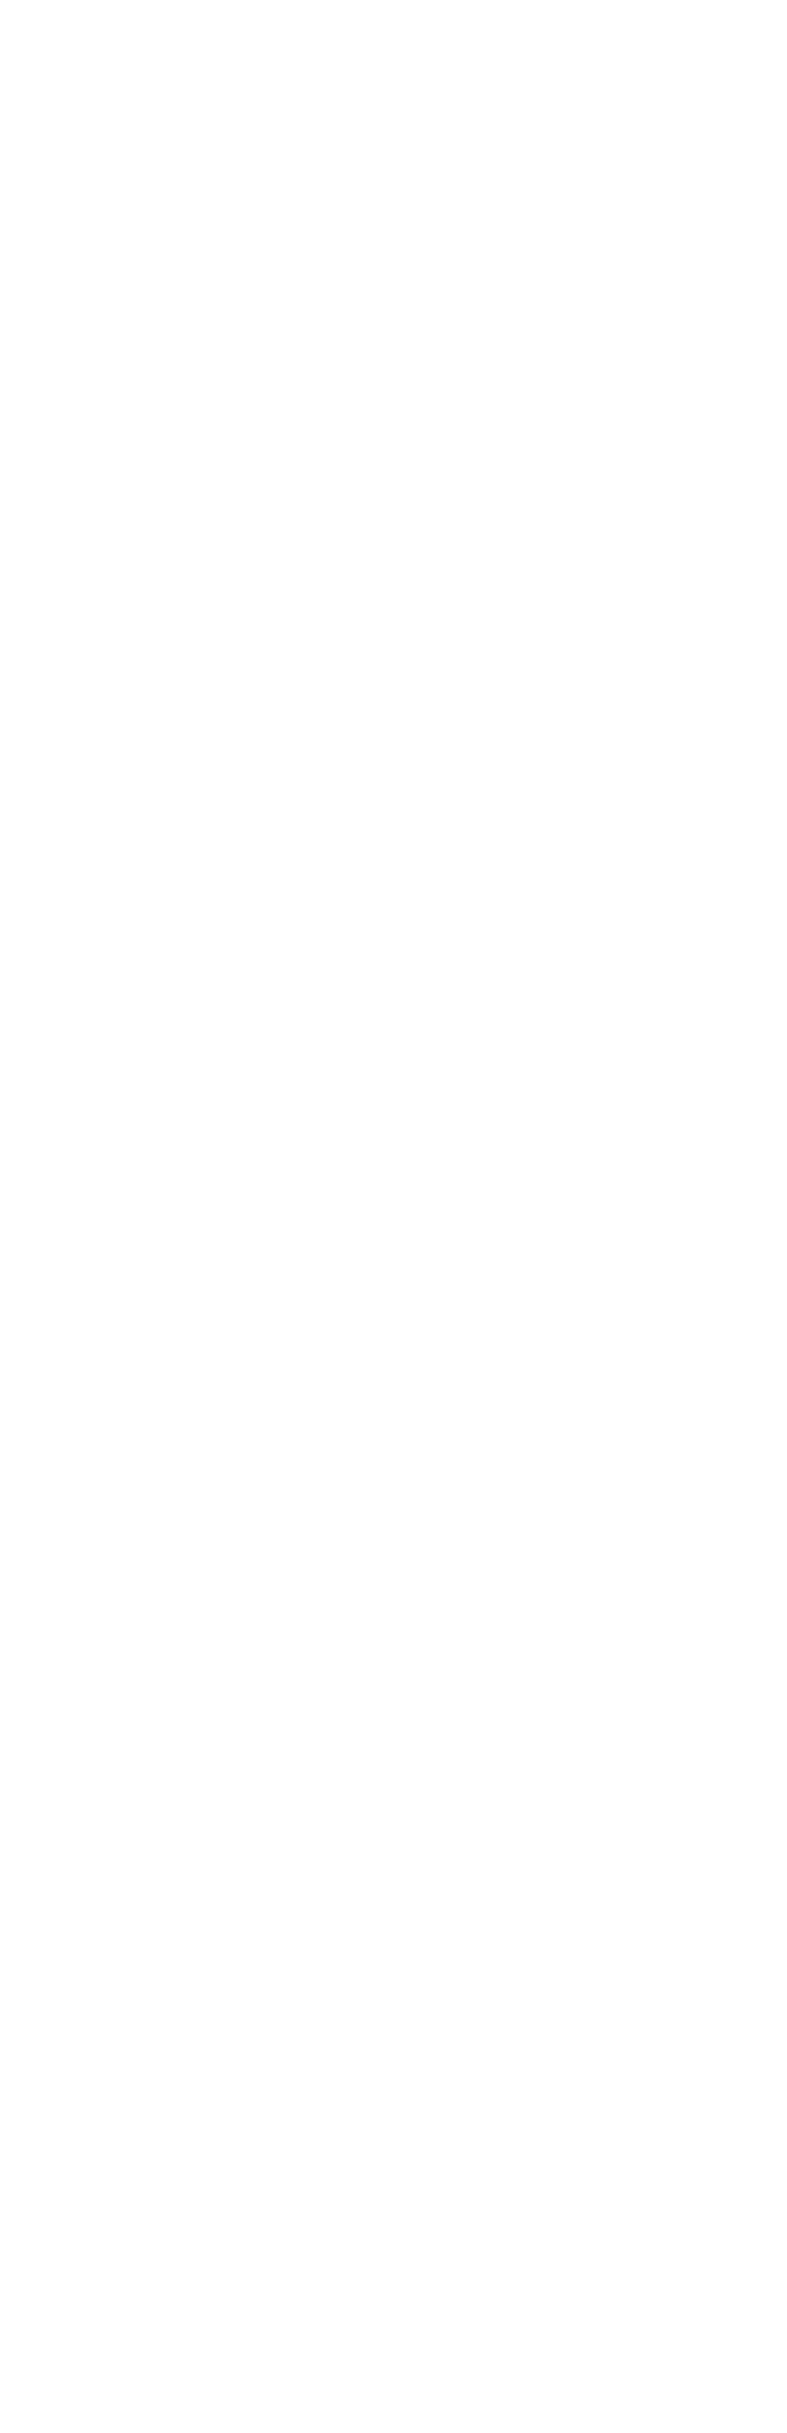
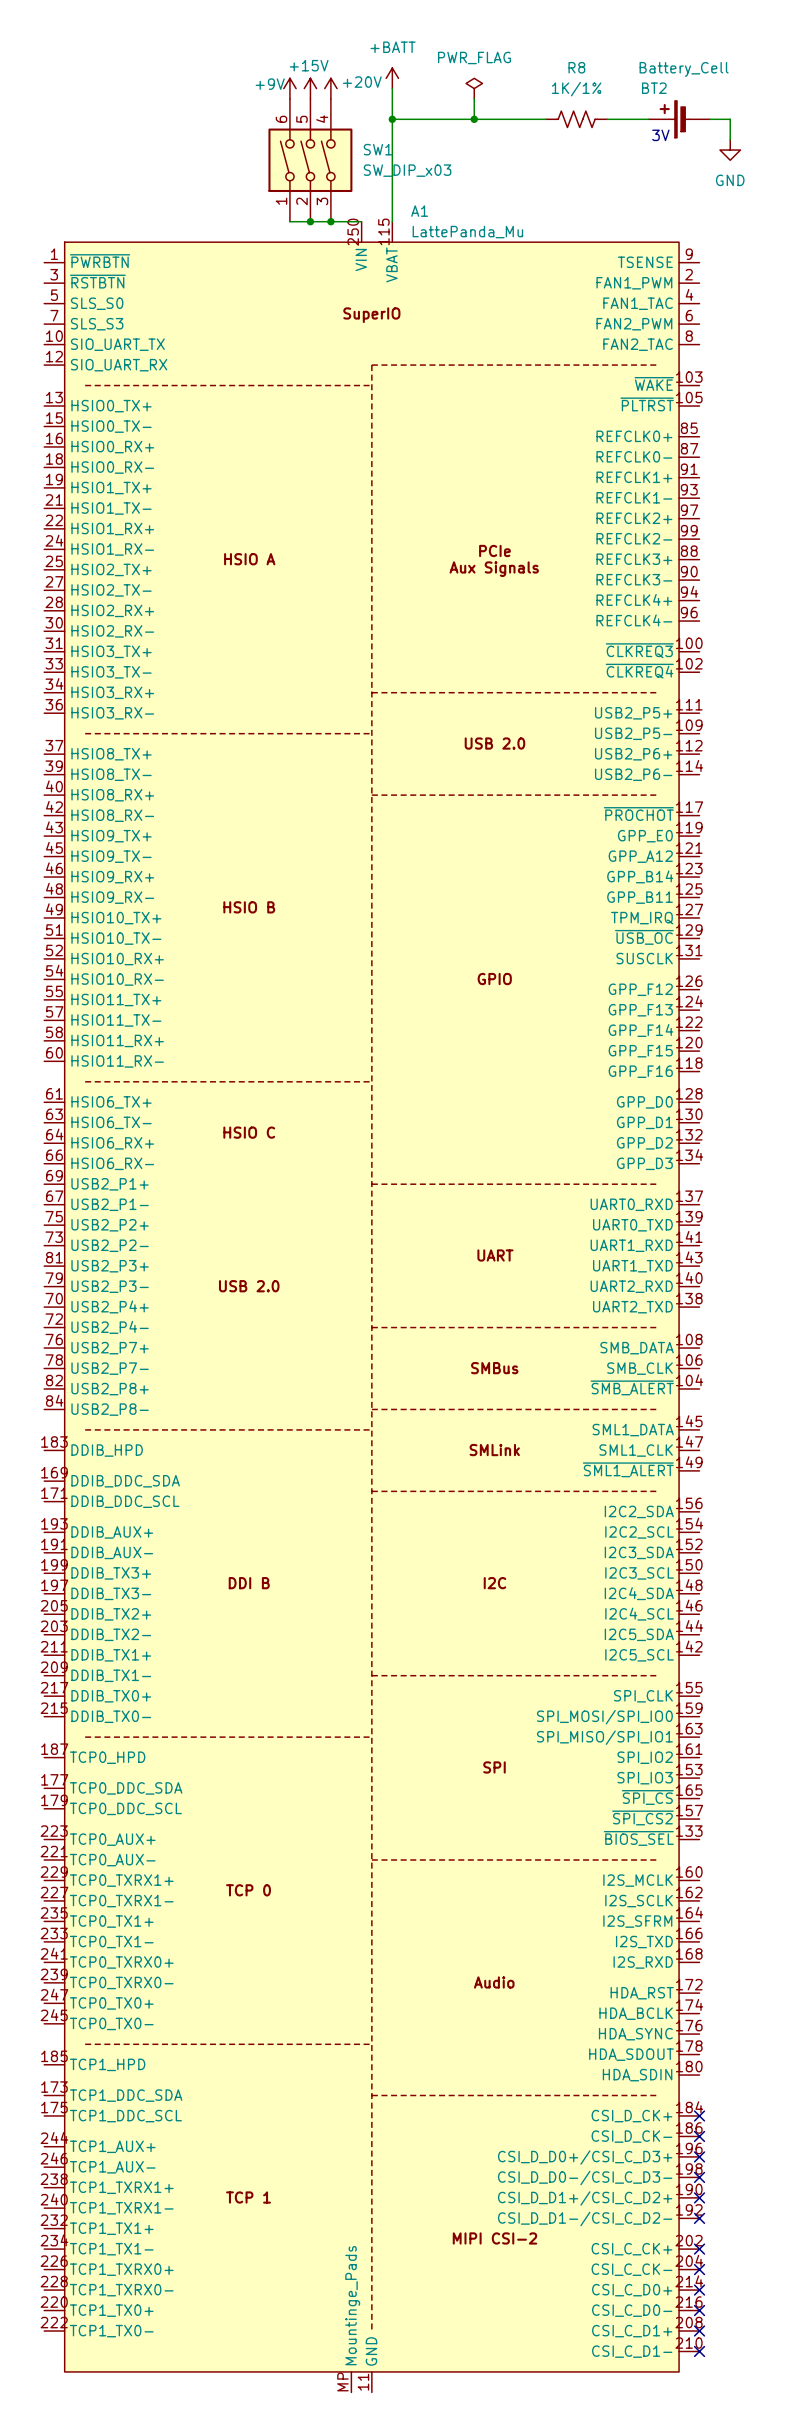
power symbol: none -> +BATT (392, 78)
power symbol: none -> +9V (289, 88)
power symbol: none -> +15V (310, 88)
power symbol: none -> +20V (330, 88)
wire: none -> (392, 88) (392, 221)
power symbol: none -> PWR_FLAG (474, 88)
wire: none -> (474, 98) (474, 119)
wire: none -> (392, 119) (545, 119)
junction: none -> (392, 119)
junction: none -> (474, 119)
R8: none -> 1K/1% (576, 119)
wire: none -> (607, 119) (648, 119)
BT2: none -> Battery_Cell (679, 119)
wire: none -> (709, 119) (730, 119) (730, 139)
text: none -> 3V (660, 135)
power symbol: none -> GND (730, 150)
SW1: none -> SW_DIP_x03 (310, 160)
wire: none -> (289, 221) (361, 221)
junction: none -> (310, 221)
junction: none -> (330, 221)
A1: none -> LattePanda_Mu (371, 1307)
no-connect mark: none -> (699, 2115)
no-connect mark: none -> (699, 2136)
no-connect mark: none -> (699, 2156)
no-connect mark: none -> (699, 2177)
no-connect mark: none -> (699, 2197)
no-connect mark: none -> (699, 2218)
no-connect mark: none -> (699, 2249)
no-connect mark: none -> (699, 2269)
no-connect mark: none -> (699, 2290)
no-connect mark: none -> (699, 2310)
no-connect mark: none -> (699, 2331)
no-connect mark: none -> (699, 2351)

